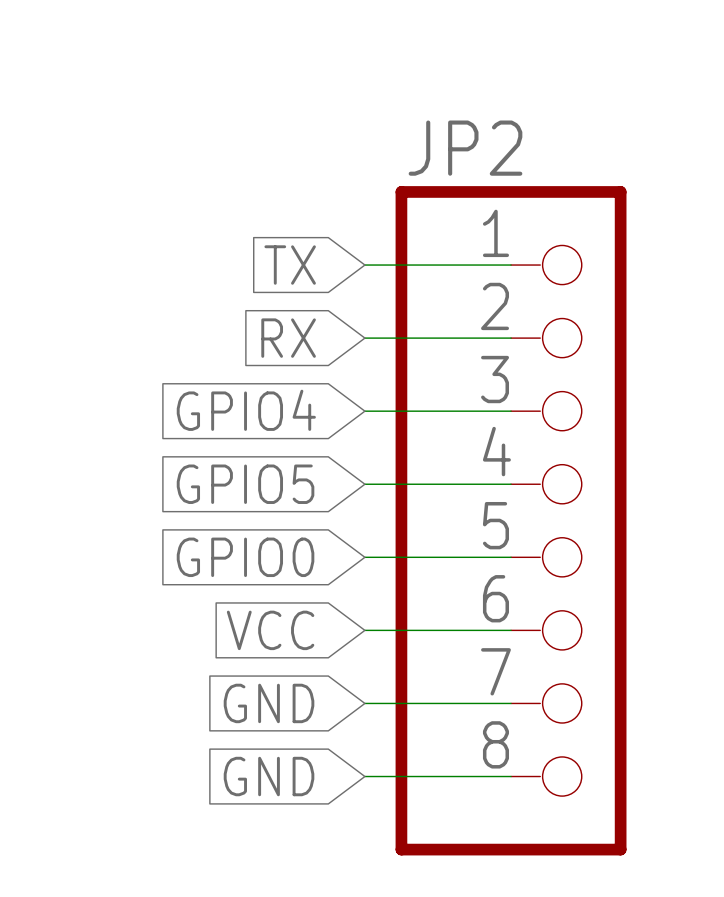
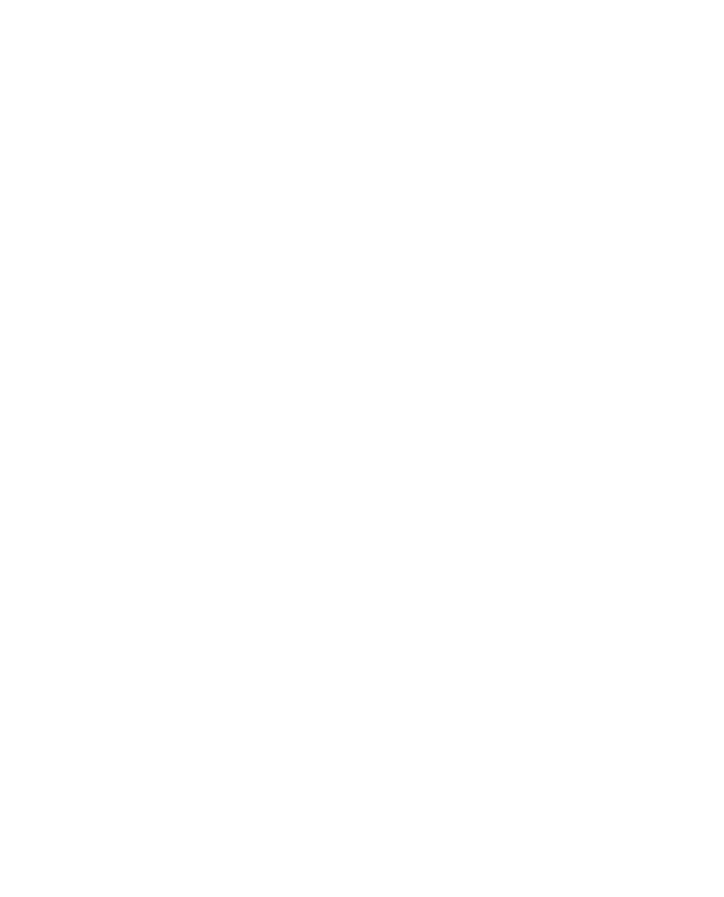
global label: TX (290, 265) -> none
wire: (364, 265) (511, 265) -> none
global label: RX (288, 338) -> none
wire: (364, 338) (511, 338) -> none
global label: GPIO4 (246, 410) -> none
wire: (364, 411) (511, 411) -> none
global label: GPIO5 (245, 484) -> none
wire: (364, 484) (511, 484) -> none
JP2: (511, 520) -> none
global label: GPIO0 (245, 557) -> none
wire: (364, 557) (511, 557) -> none
global label: VCC (270, 630) -> none
wire: (364, 630) (511, 630) -> none
global label: GND (269, 703) -> none
wire: (364, 703) (511, 703) -> none
global label: GND (269, 776) -> none
wire: (364, 776) (511, 776) -> none

